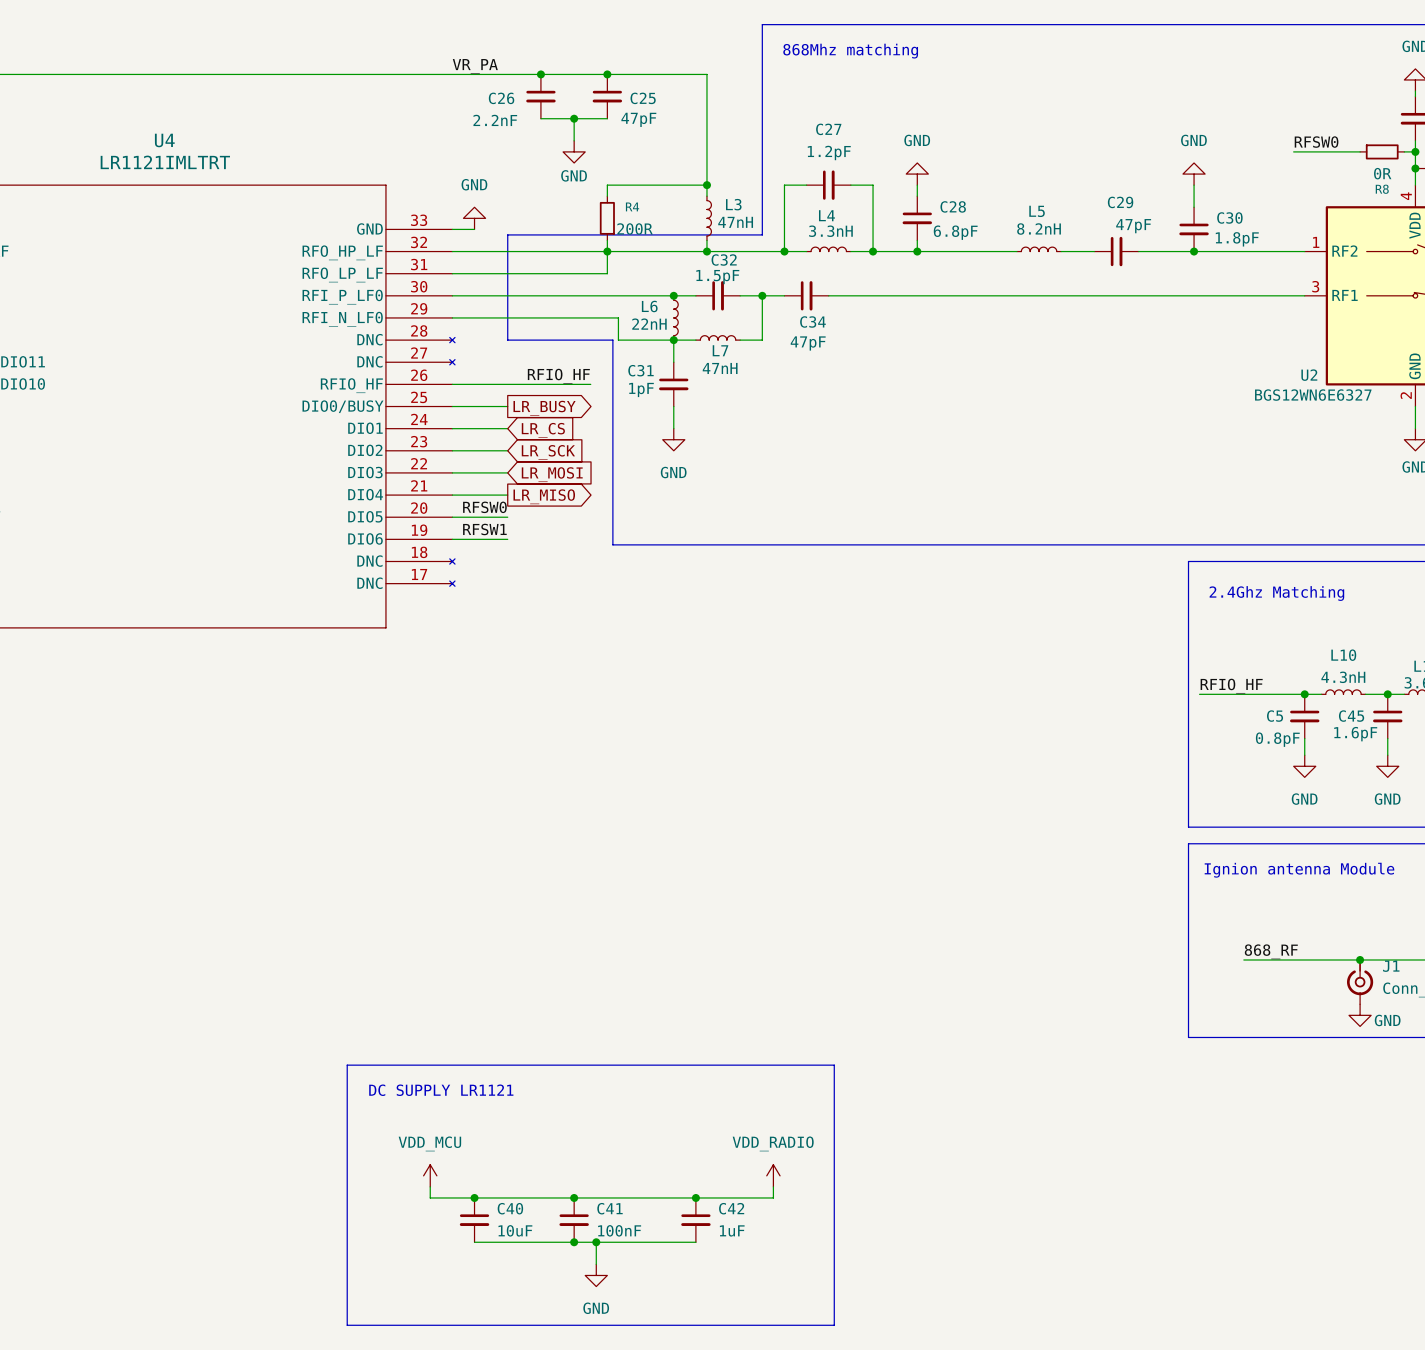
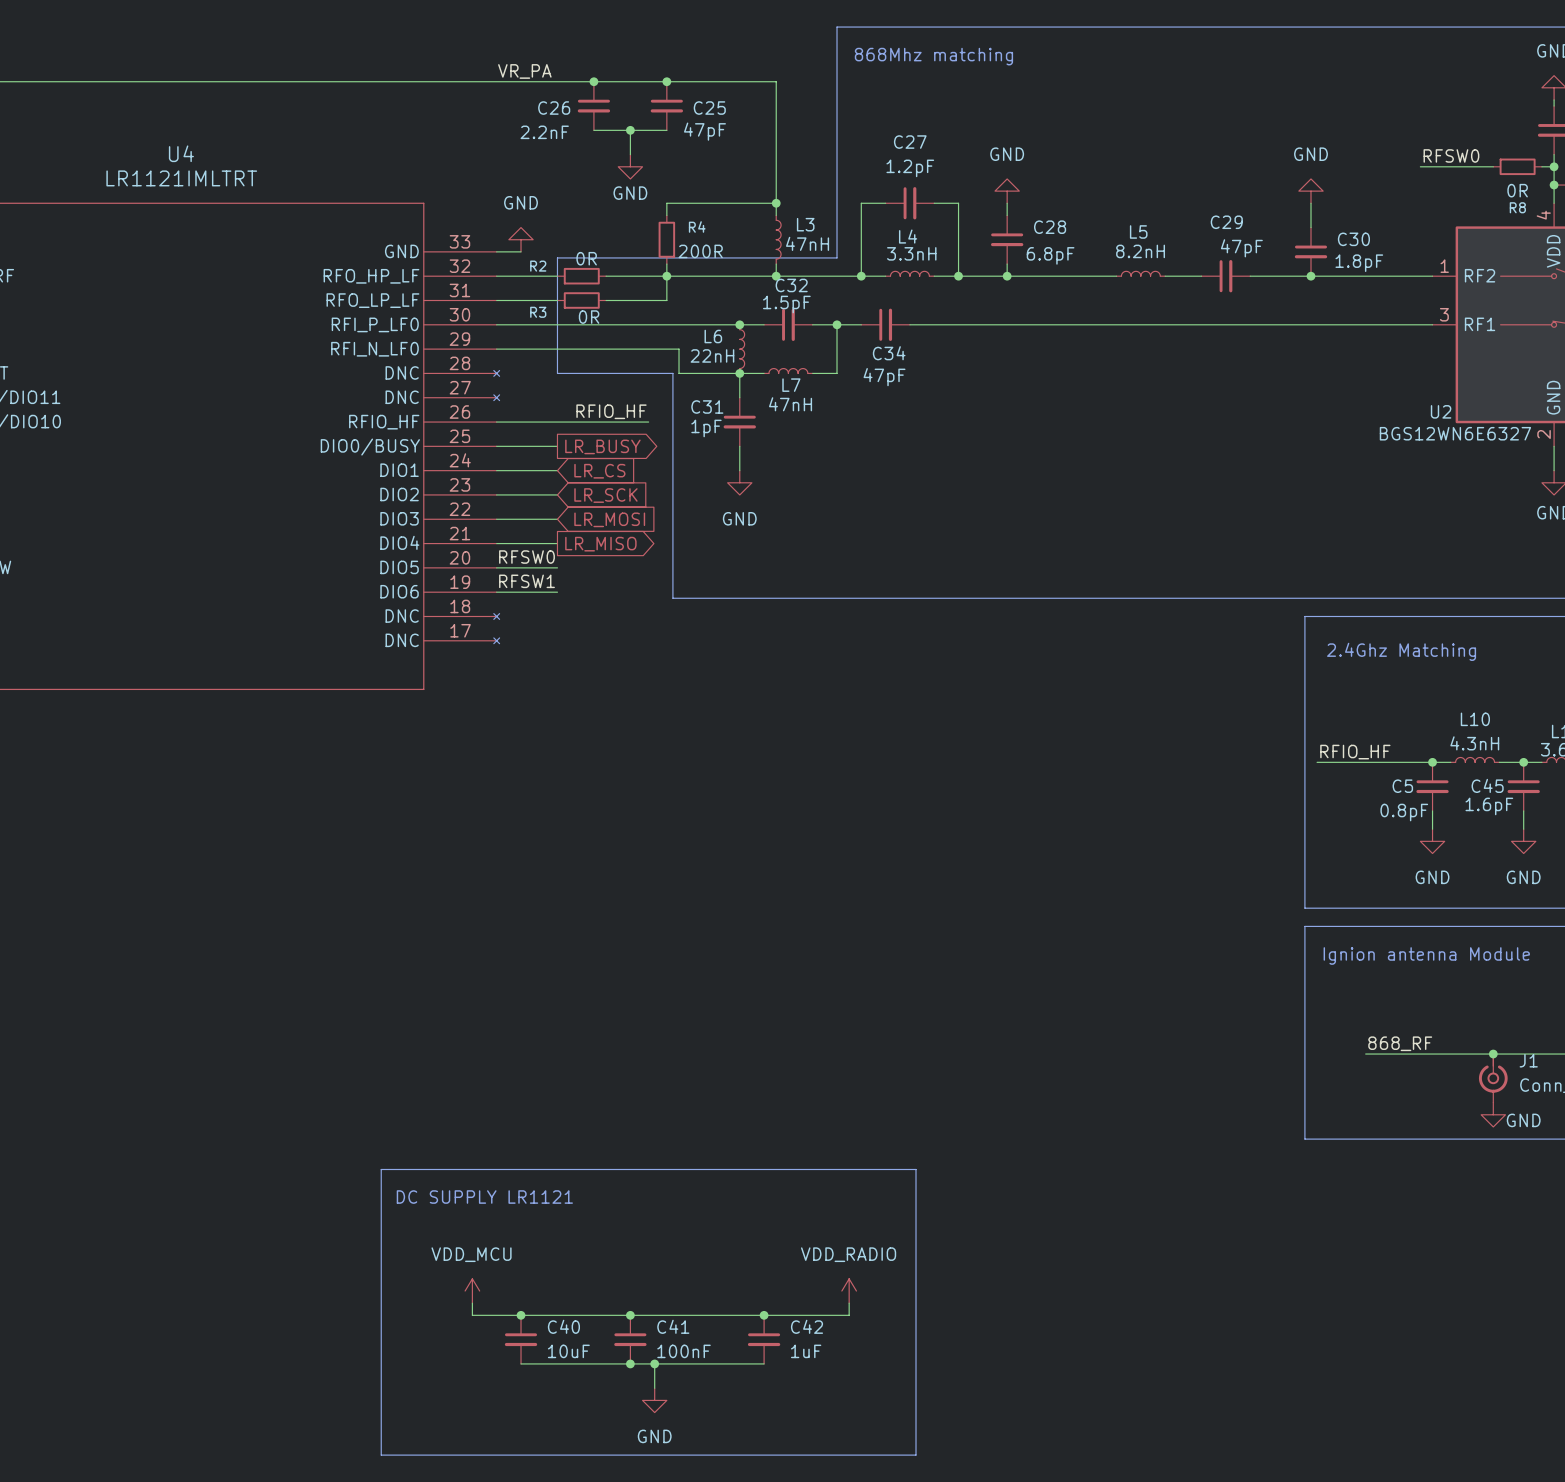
wire: (507, 251) (552, 251) -> none
R2: none -> 0R (581, 276)
wire: (507, 273) (552, 273) -> none
R3: none -> 0R (581, 300)

